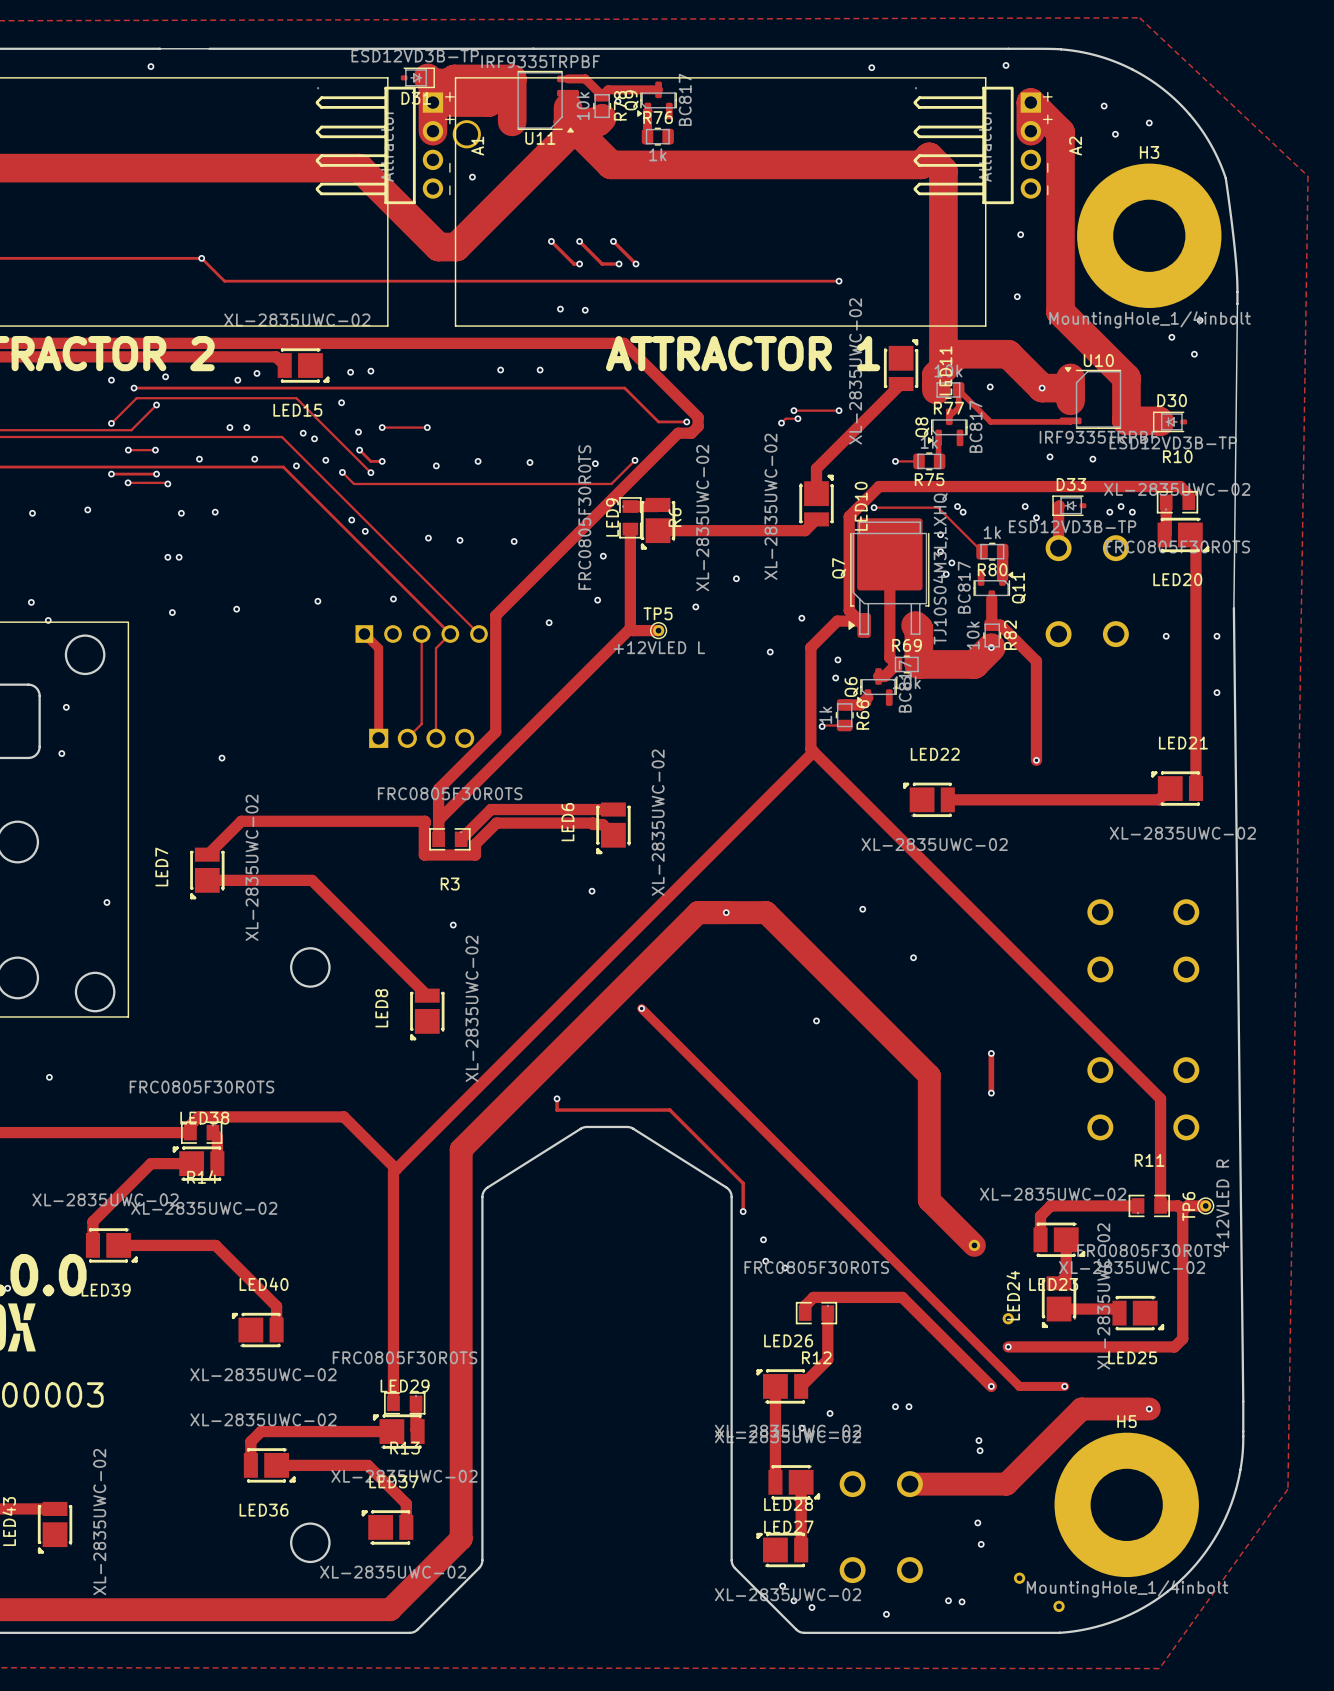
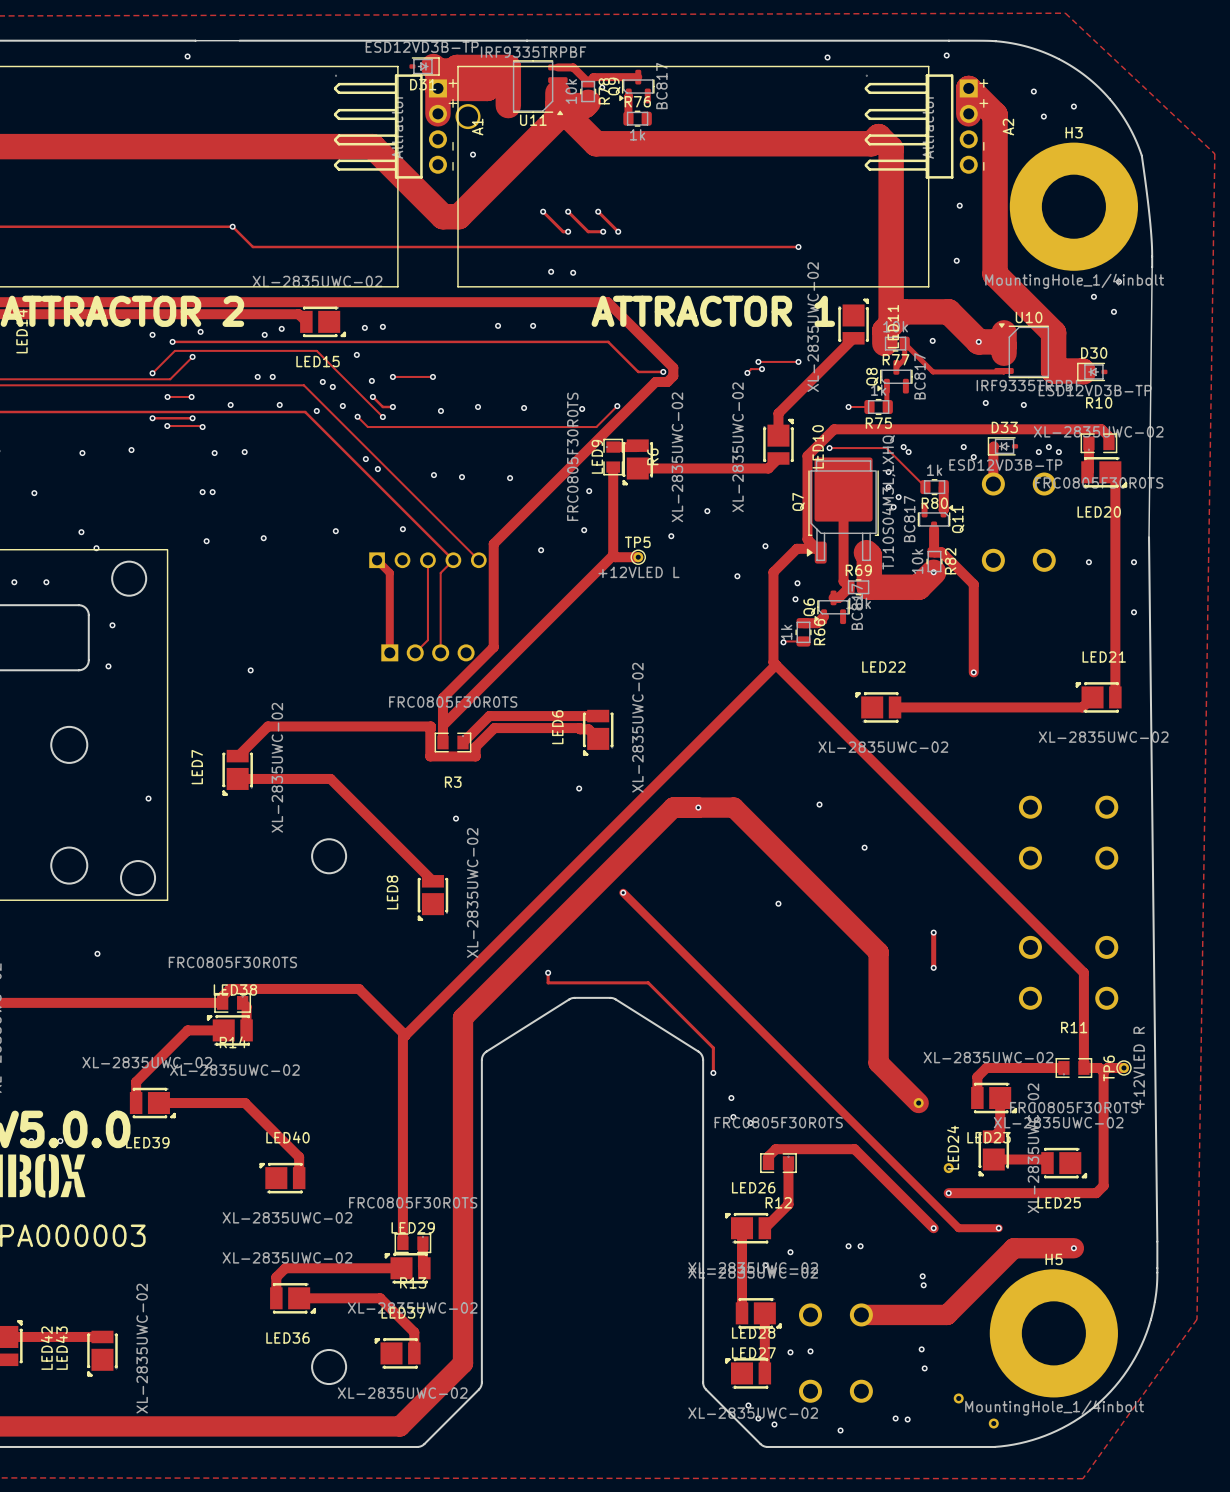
via: none -> (810, 1351)
via: none -> (790, 1352)

